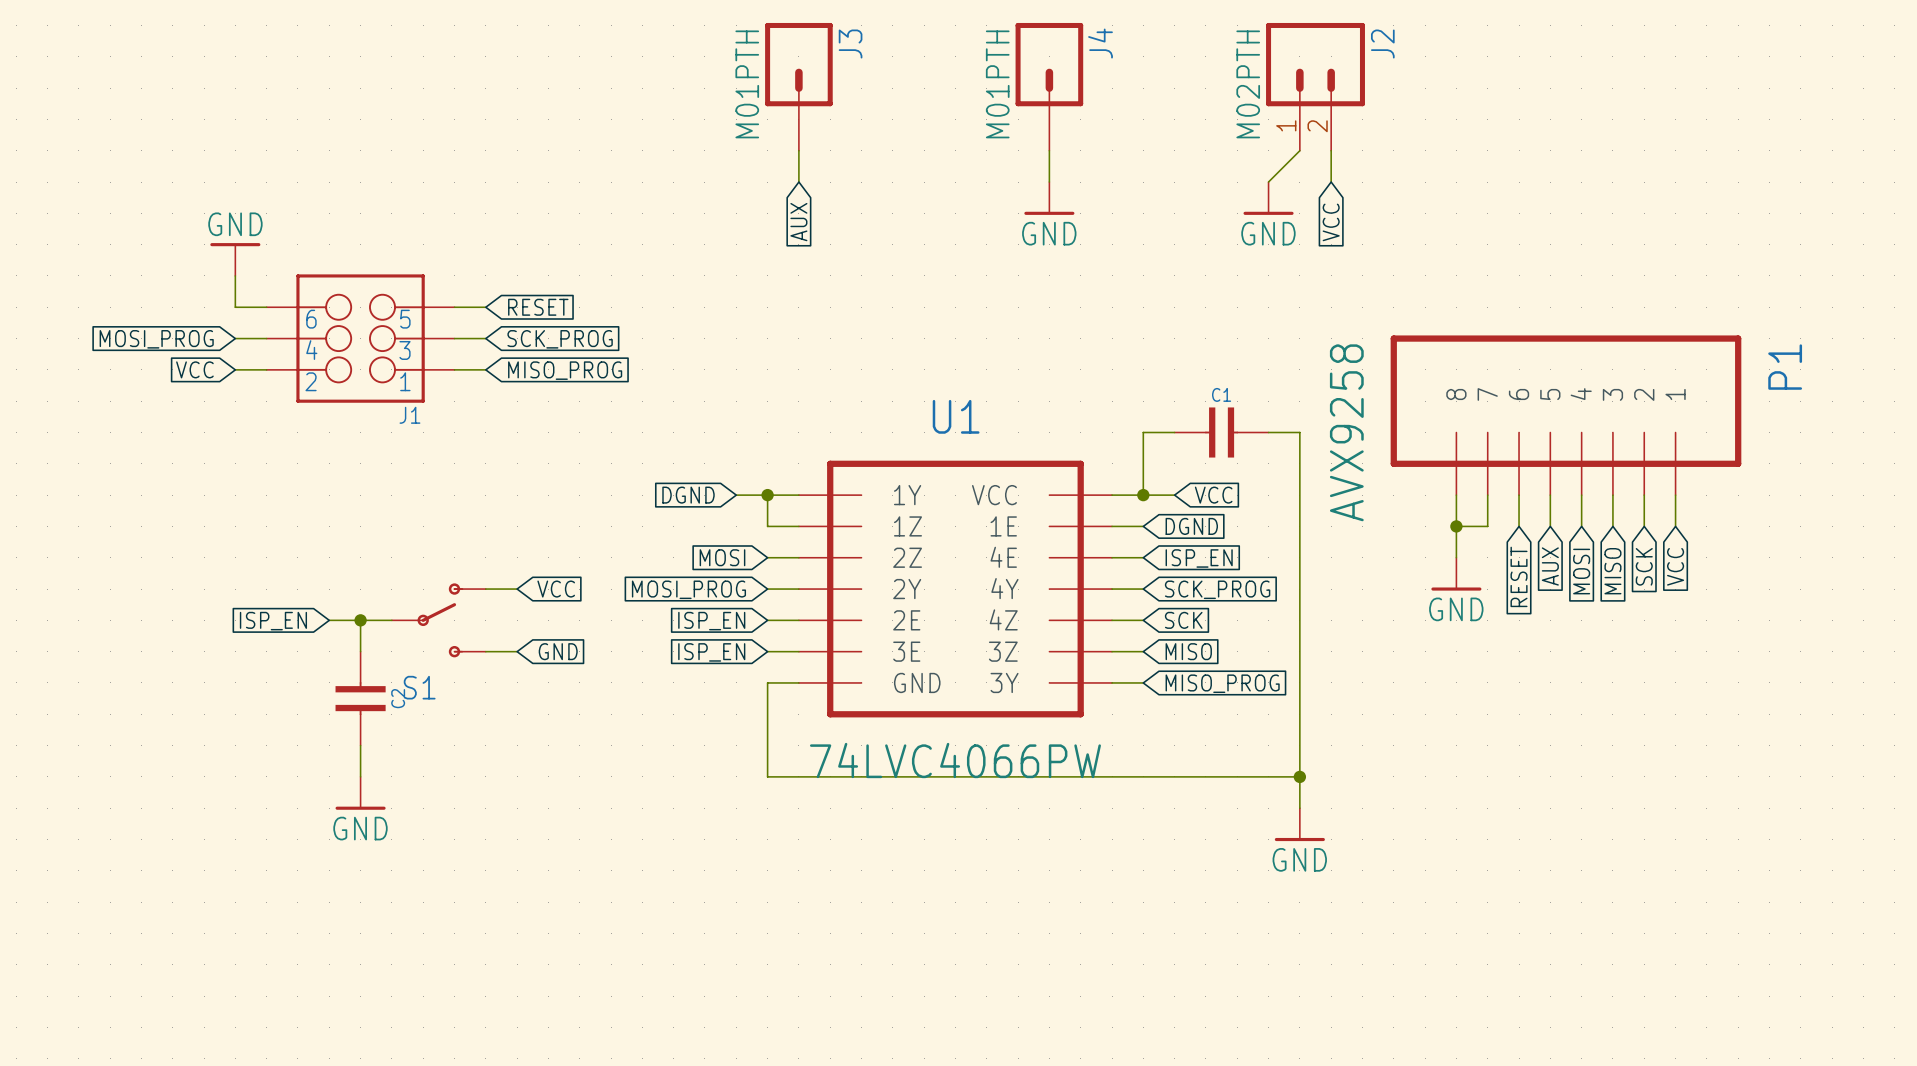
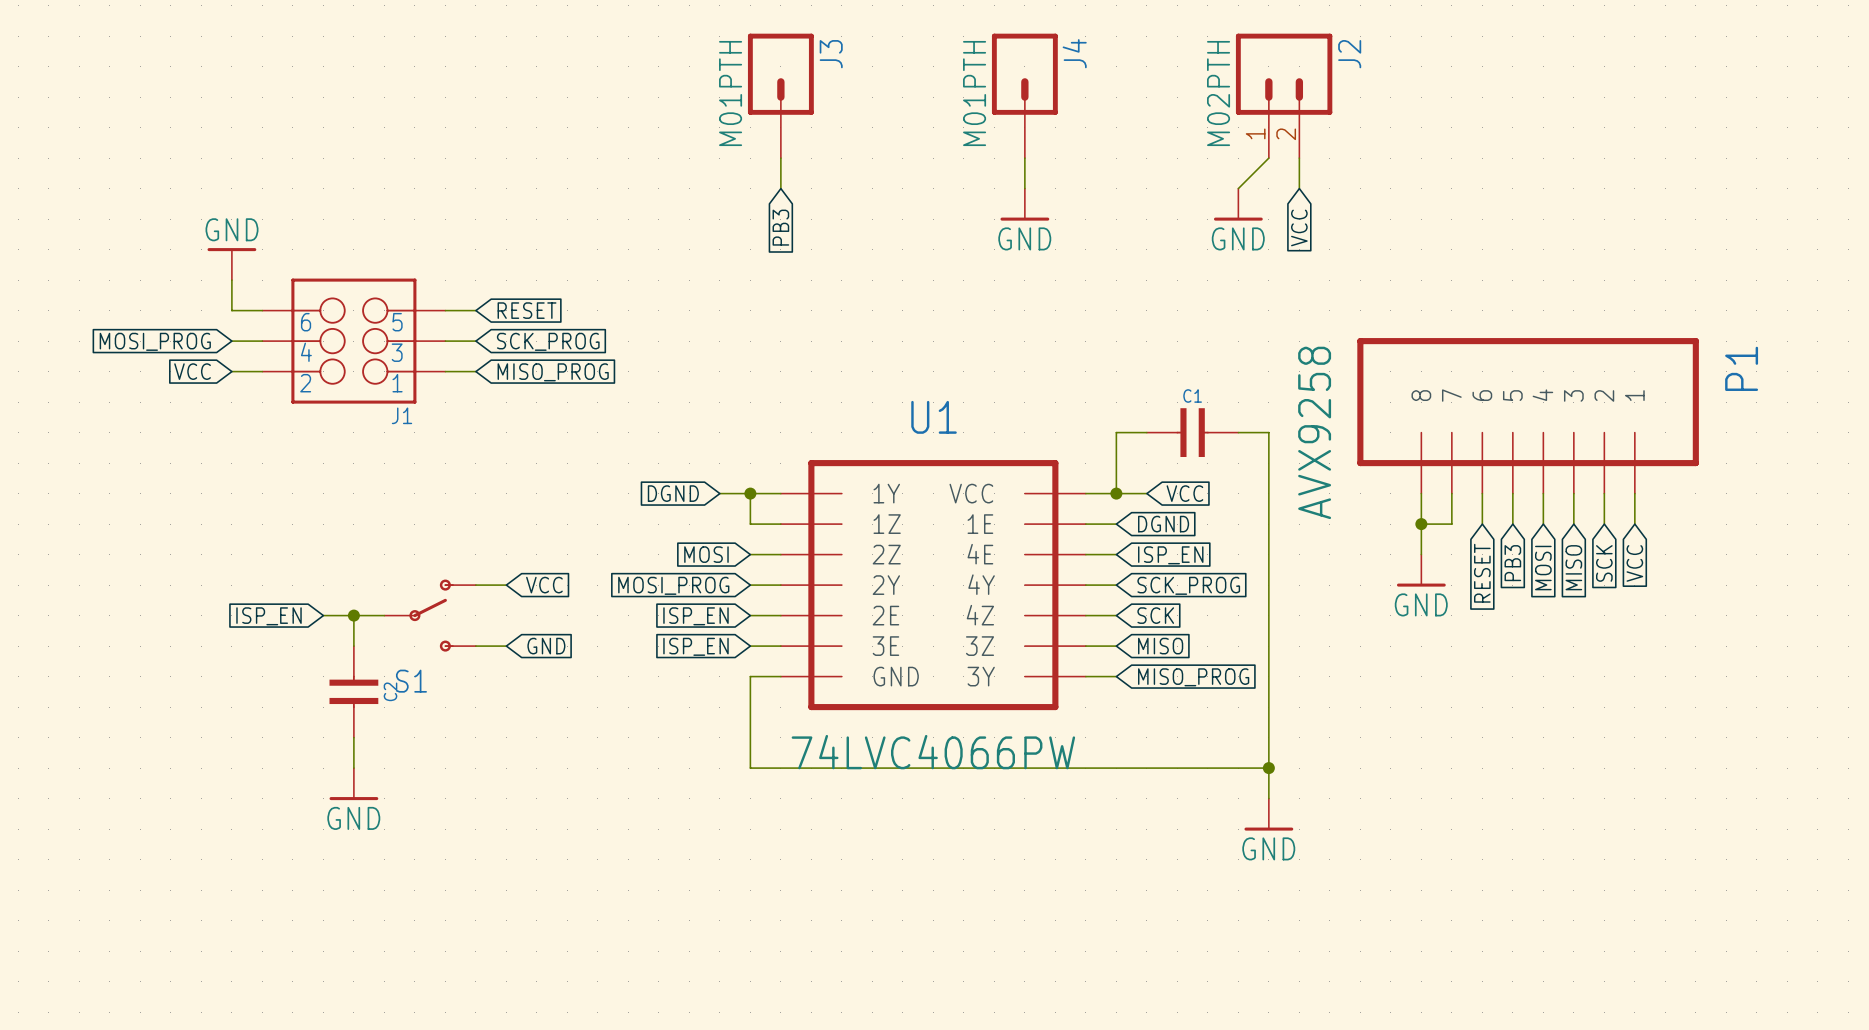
global label: AUX (798, 222) -> PB3 (780, 227)
global label: AUX (1550, 566) -> PB3 (1512, 563)

